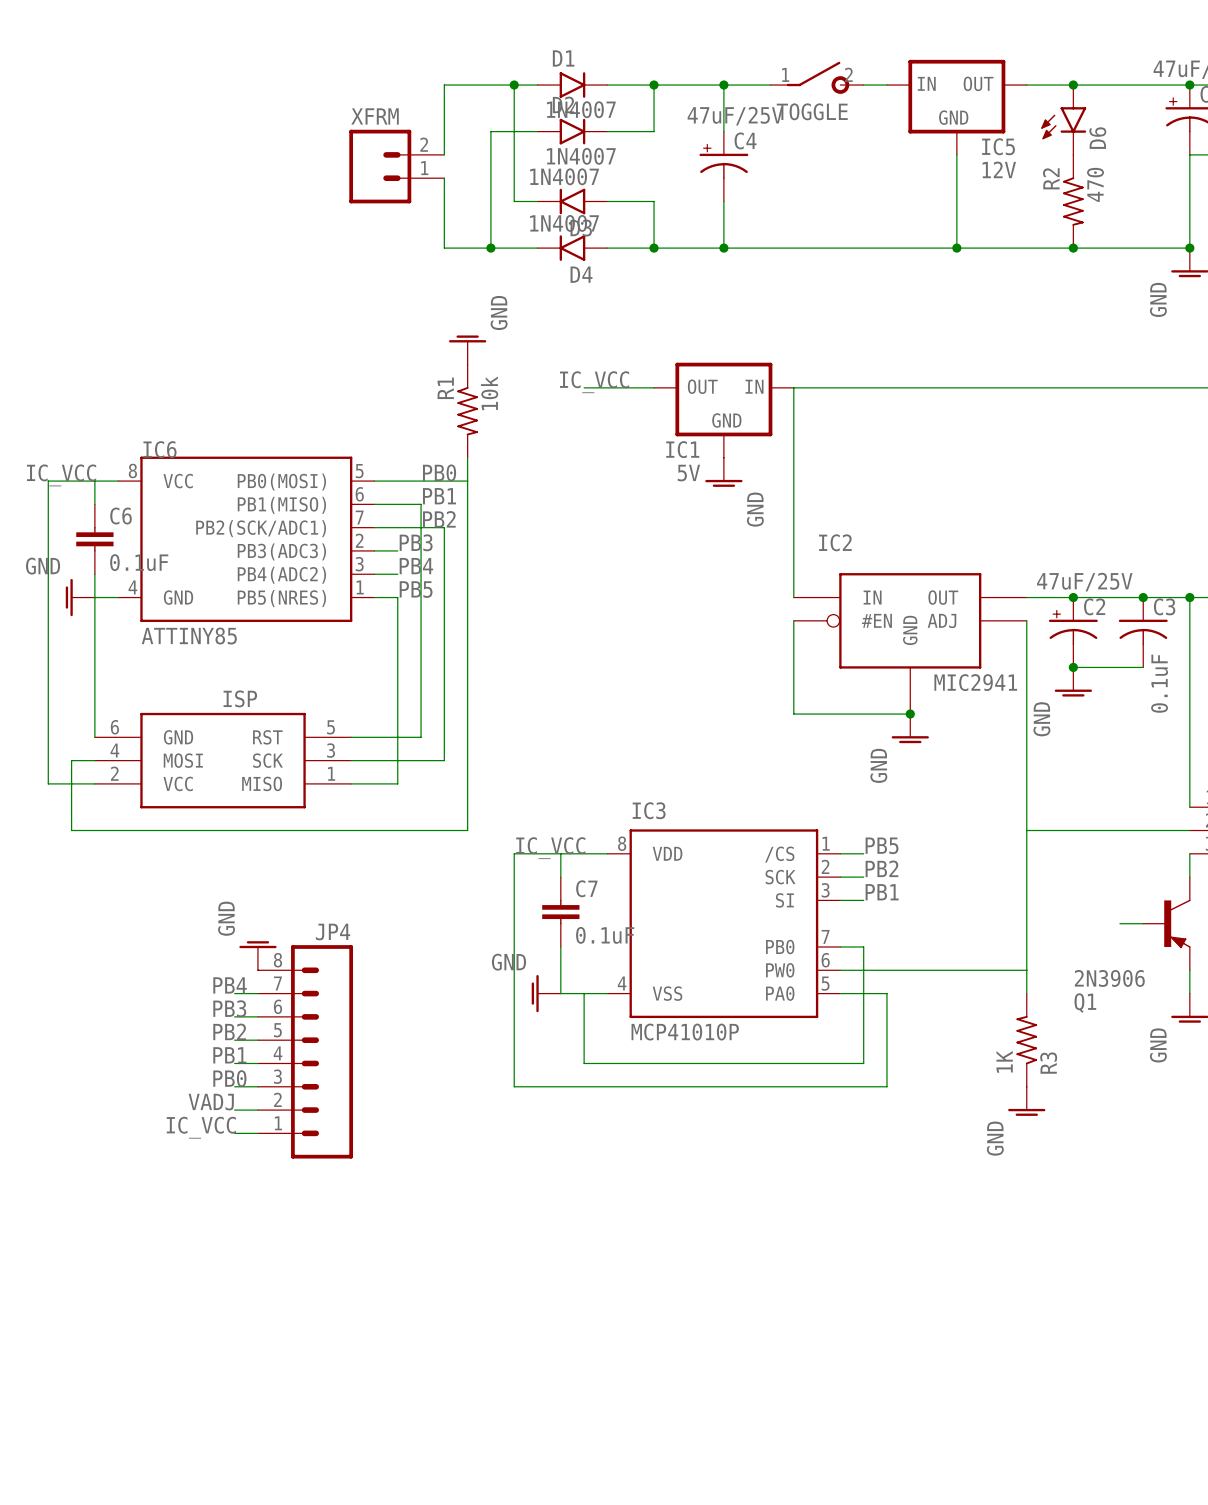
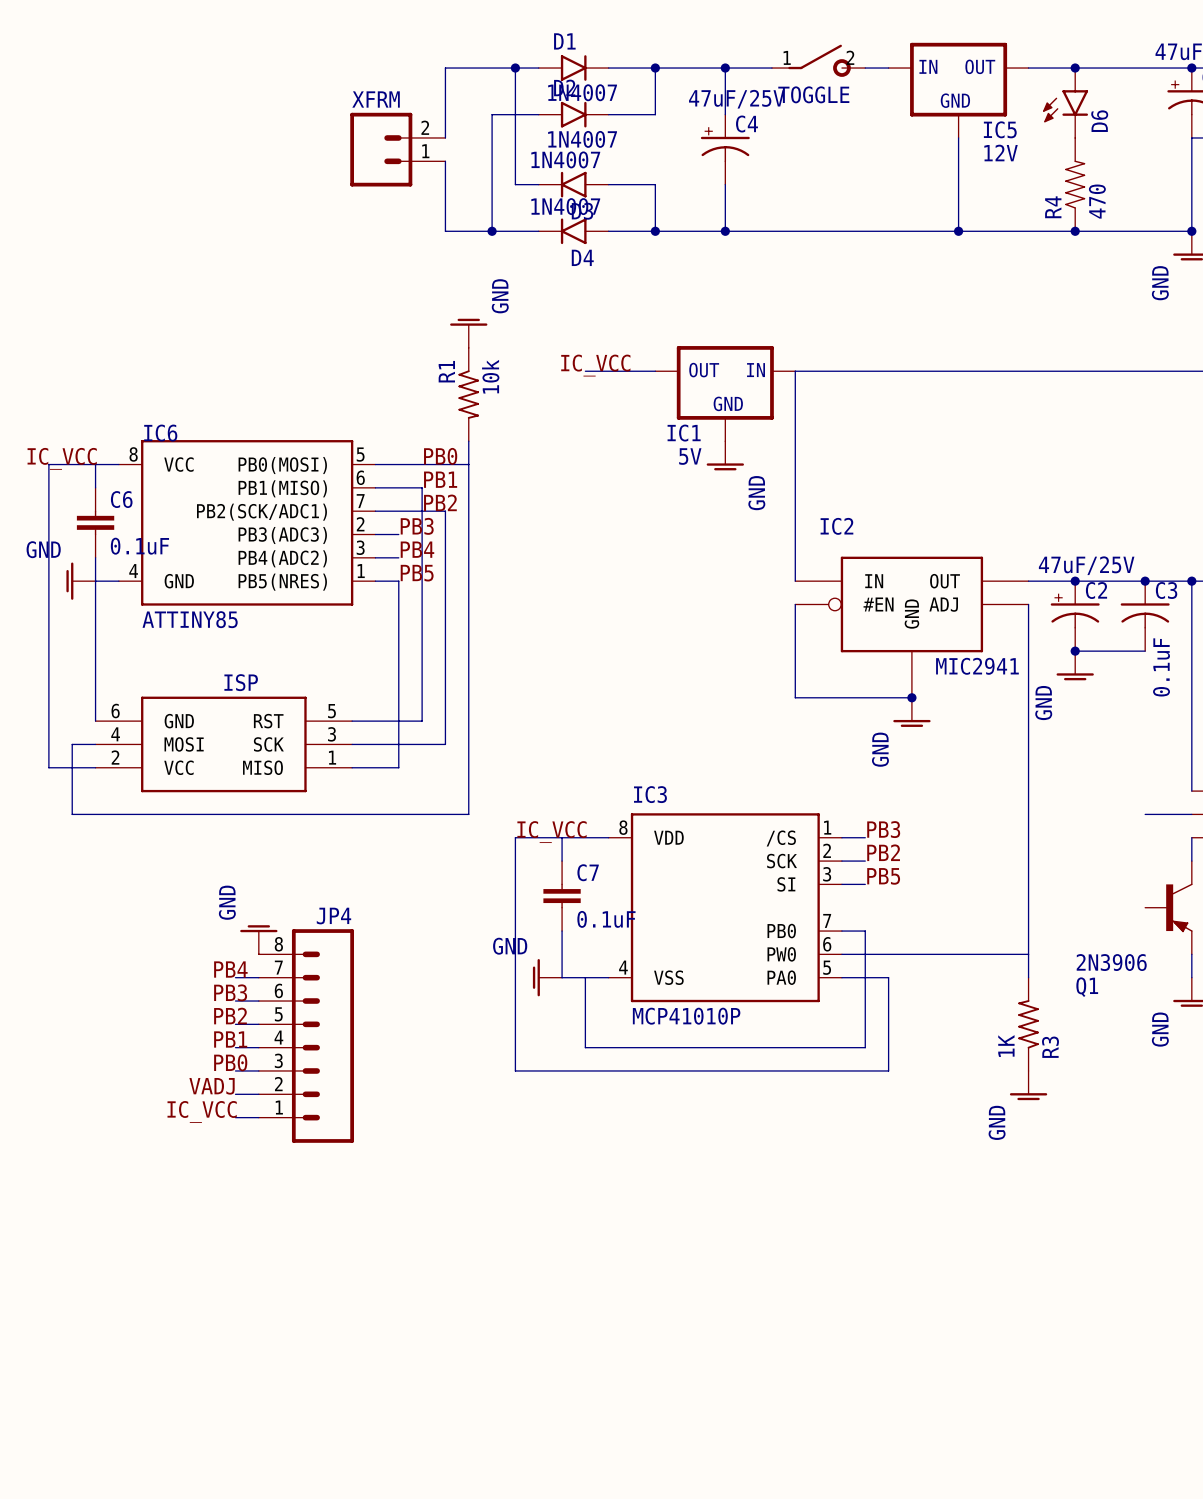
R2: 470 (1073, 201) -> none
R4: none -> 470 (1075, 184)
wire: (1026, 830) (1143, 830) -> none
label: PB5 (882, 845) -> PB3 (883, 829)
label: PB1 (882, 892) -> PB5 (883, 876)
wire: (1119, 923) (1143, 923) -> none

